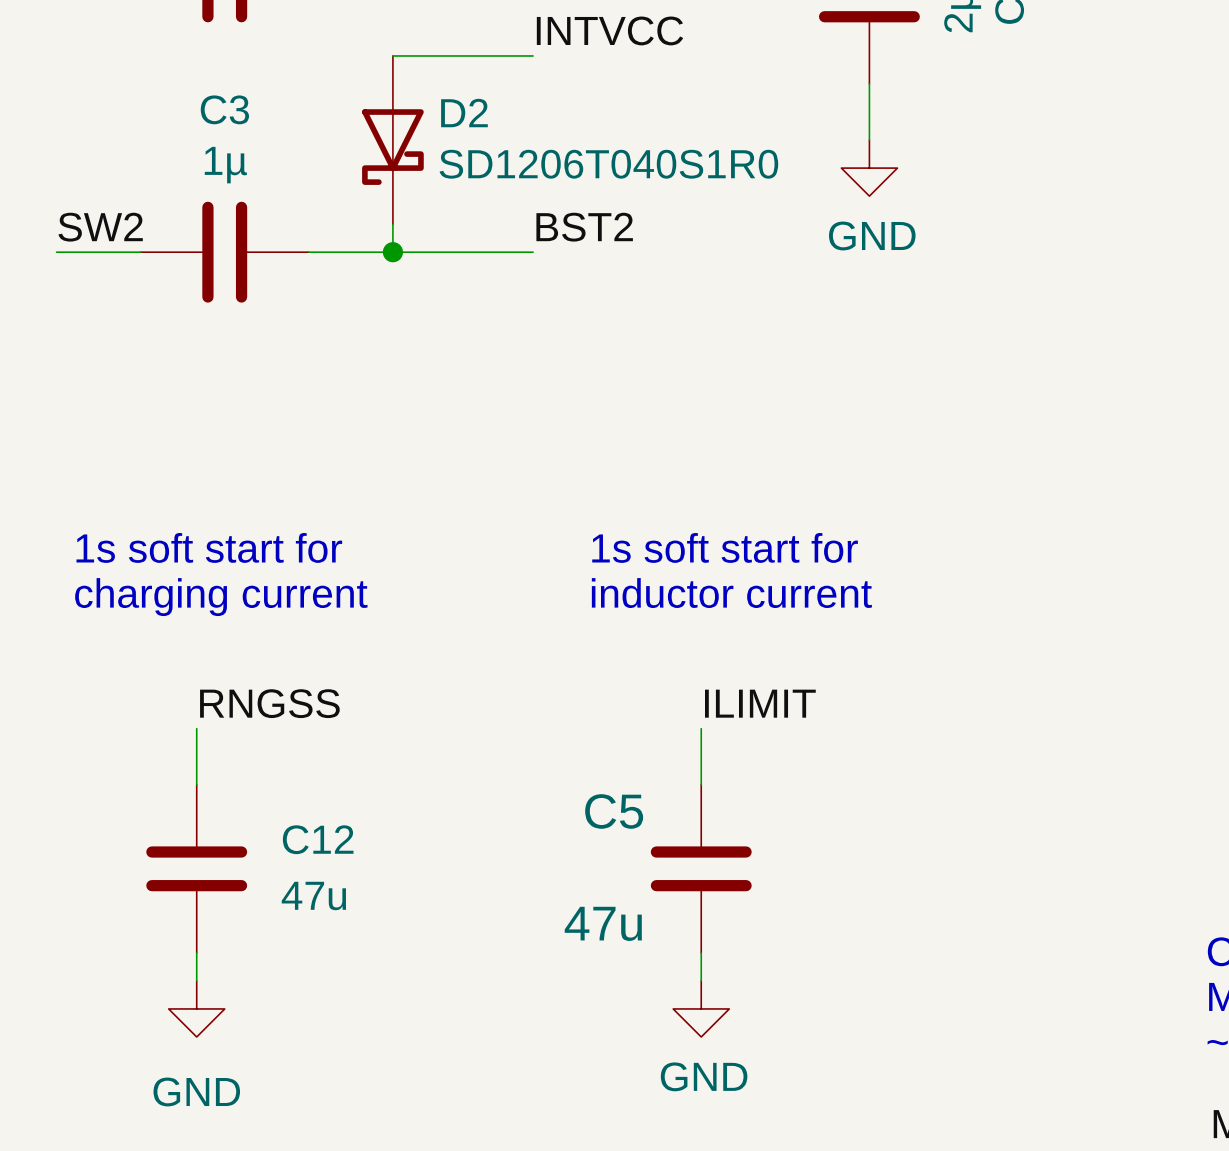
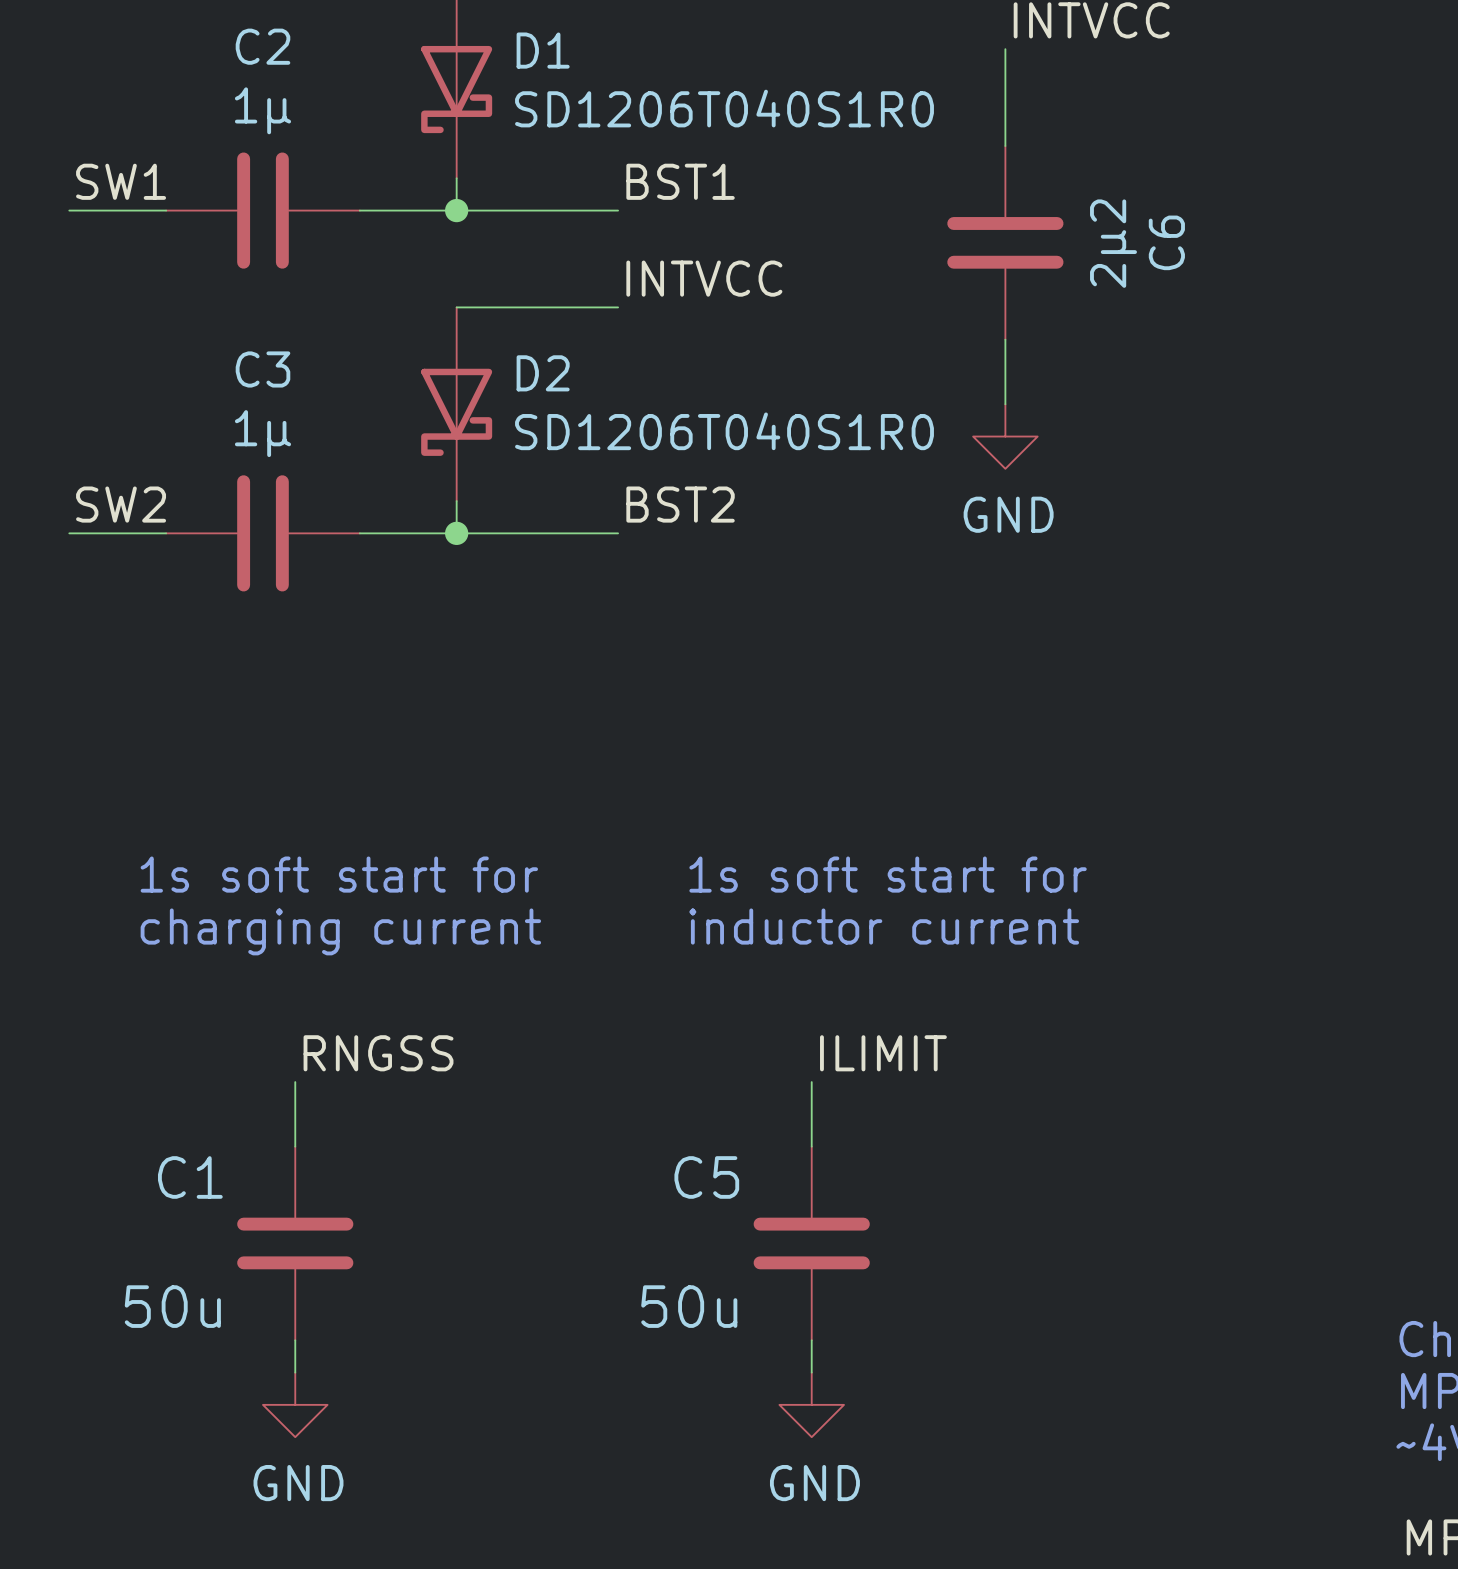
text position: 1s soft start for (209, 547) -> 1s soft start for (339, 874)
text position: charging current (221, 597) -> charging current (340, 931)
label position: RNGSS (269, 703) -> RNGSS (378, 1053)
wire: (196, 728) (196, 784) -> (295, 1082) (295, 1146)
C12: 47u (196, 868) -> none
C1: none -> 50u (295, 1243)
C5 value: 47u (603, 923) -> 50u (689, 1306)
wire: (196, 952) (196, 980) -> (295, 1340) (295, 1372)
power symbol position: GND (196, 1008) -> GND (295, 1404)
power symbol text position: GND (196, 1092) -> GND (298, 1483)

